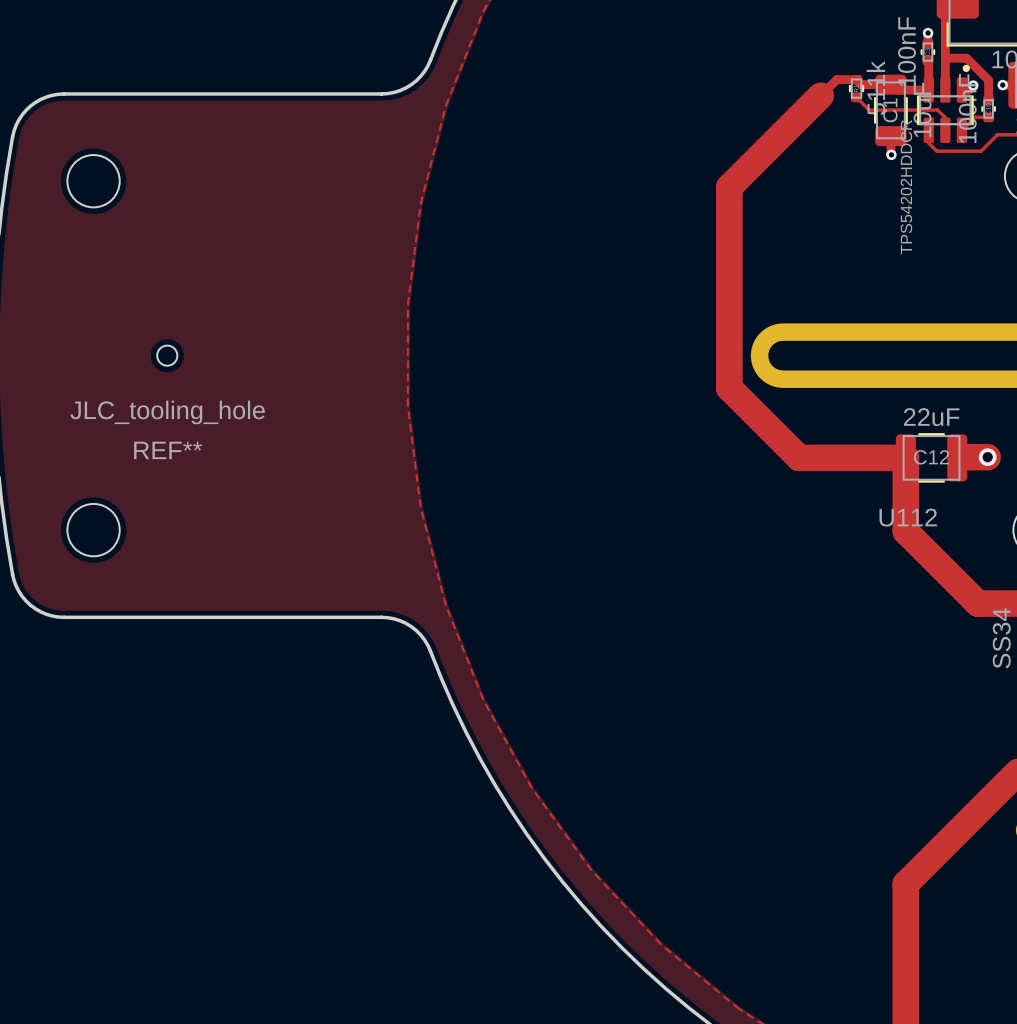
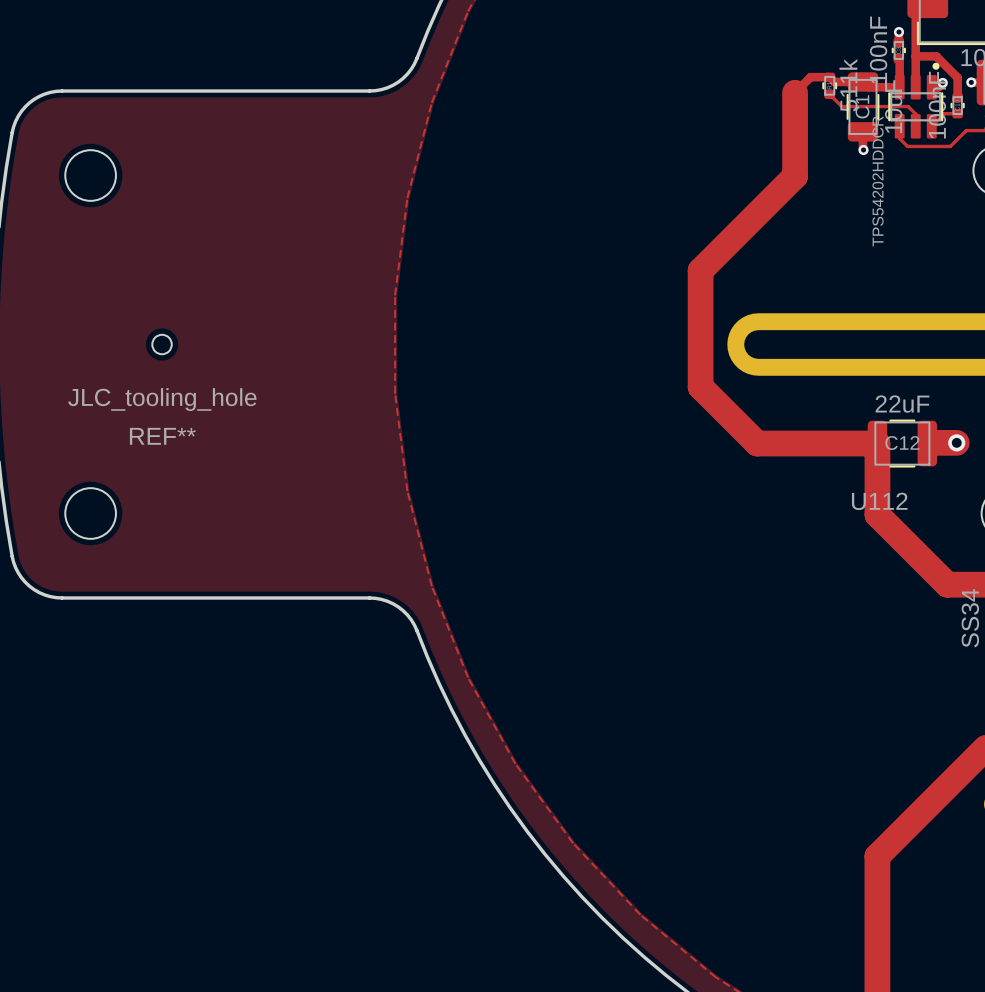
track: (820, 95) (729, 187) (729, 388) (799, 457) -> (795, 92) (795, 176) (700, 270) (700, 386) (757, 443) (774, 443)

